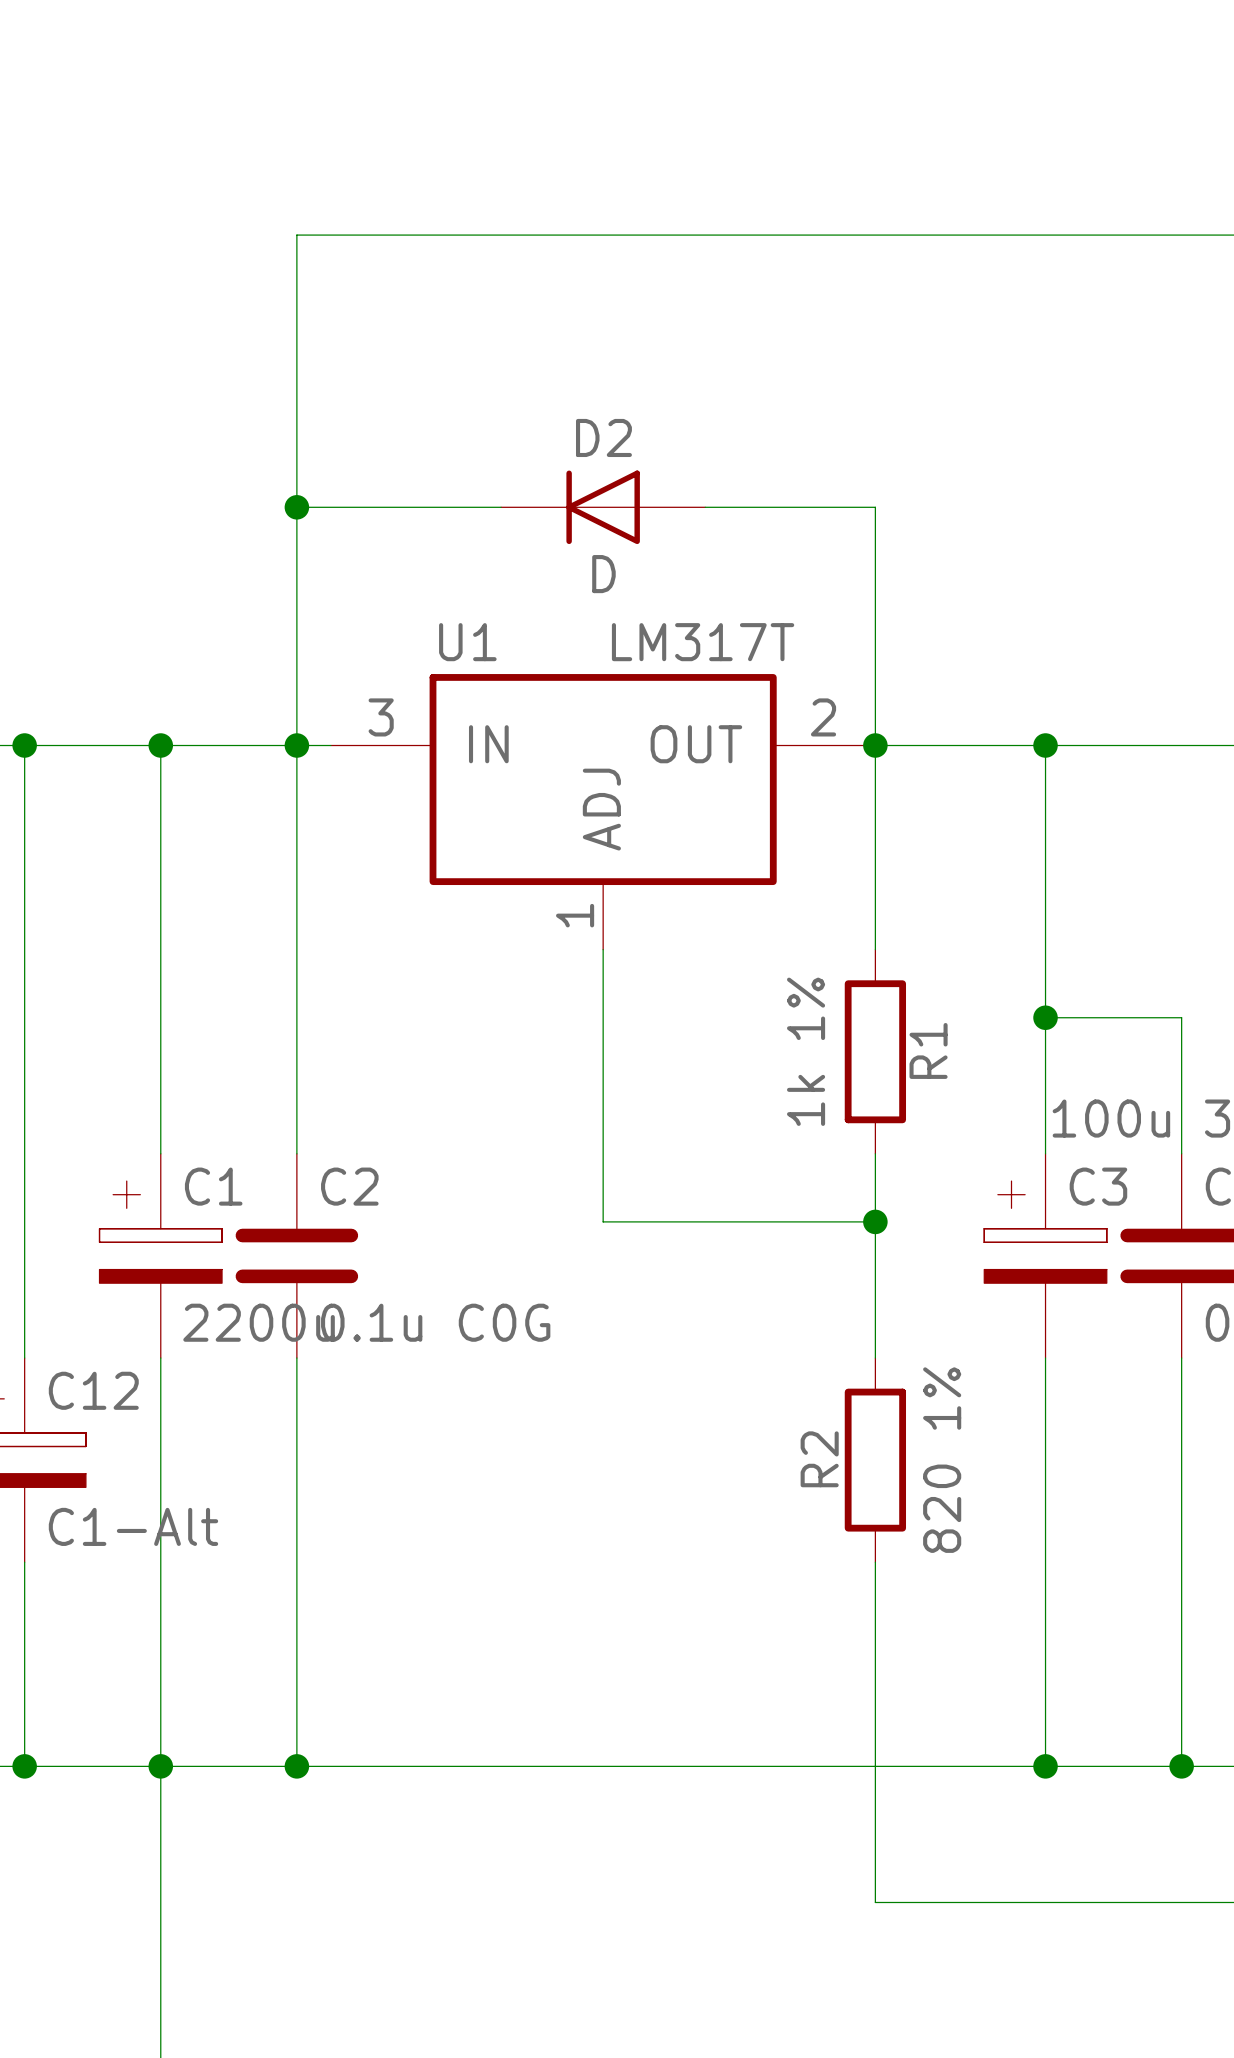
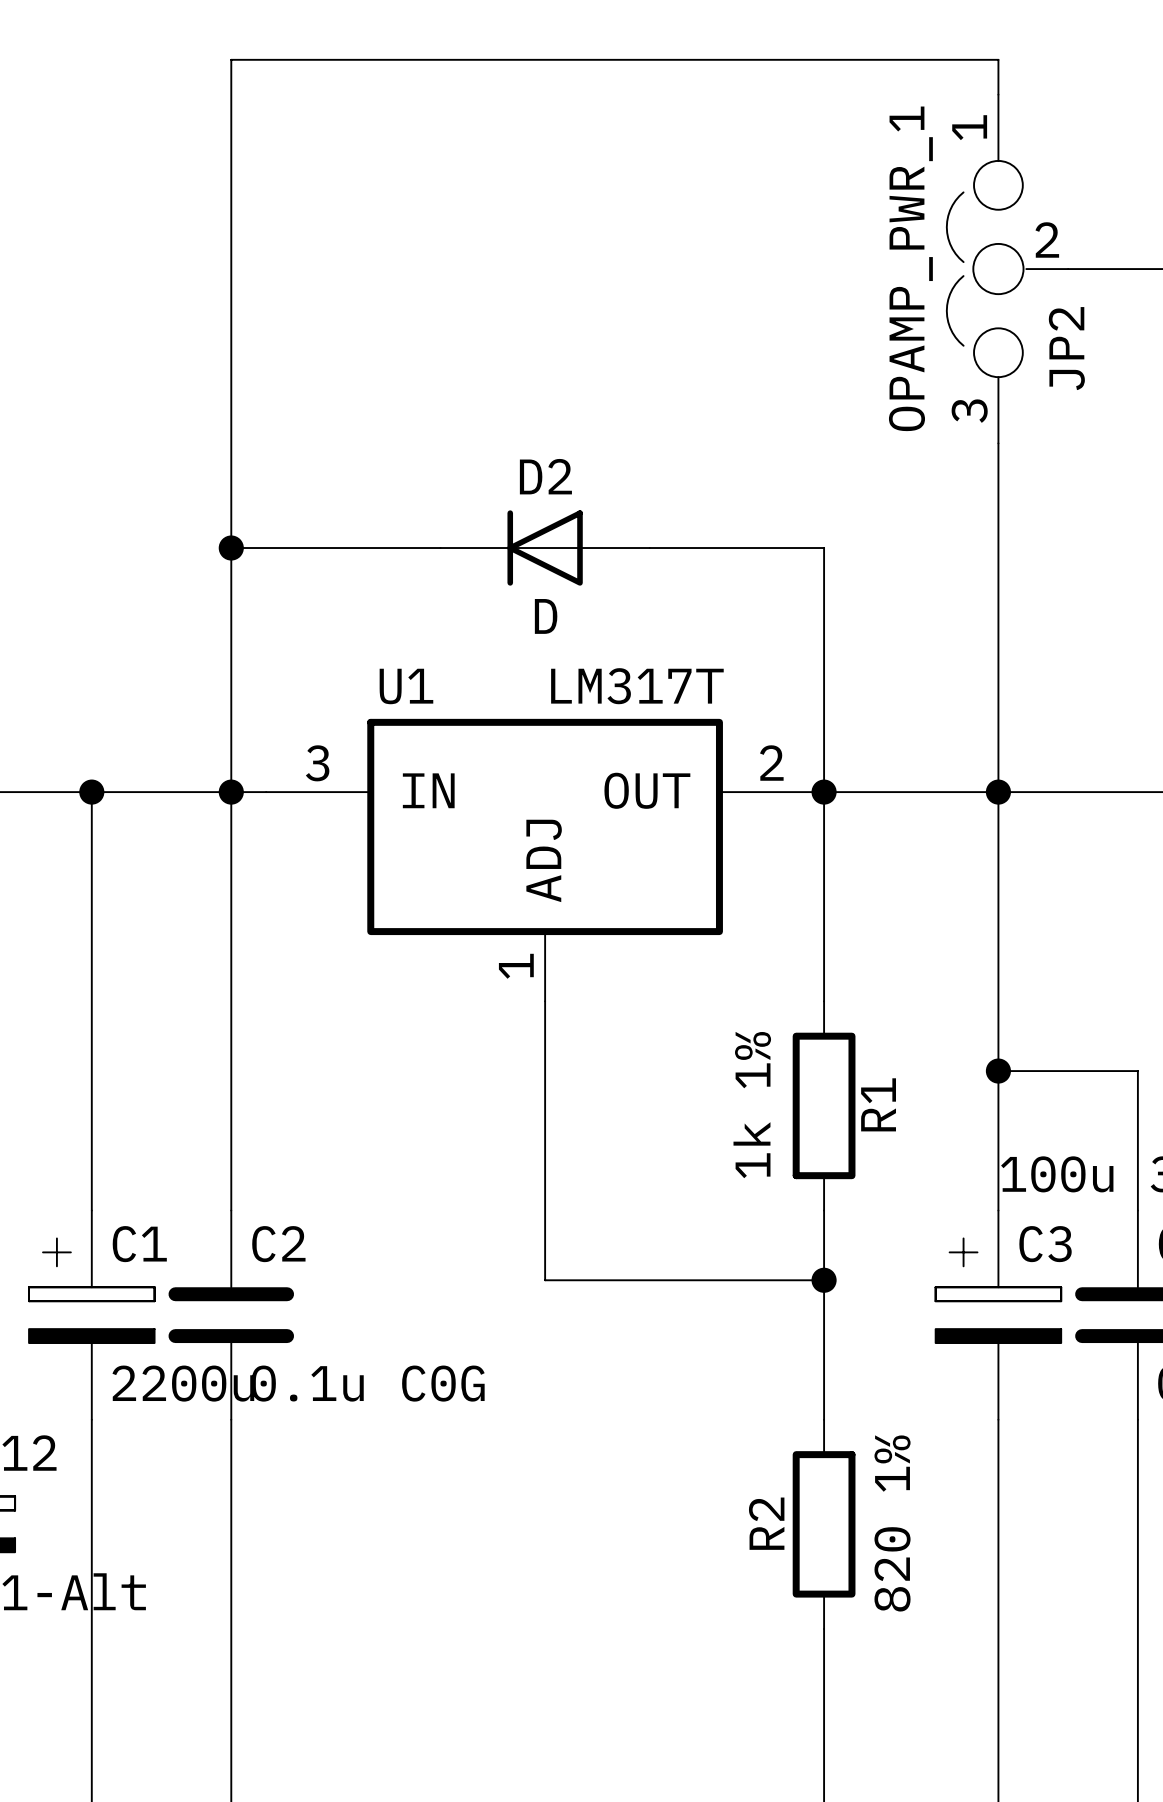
wire: (296, 235) (1113, 235) -> (231, 269) (231, 59) (998, 59) (998, 94)
JP2: none -> OPAMP_PWR_1 (1007, 269)
wire: none -> (998, 443) (998, 792)

